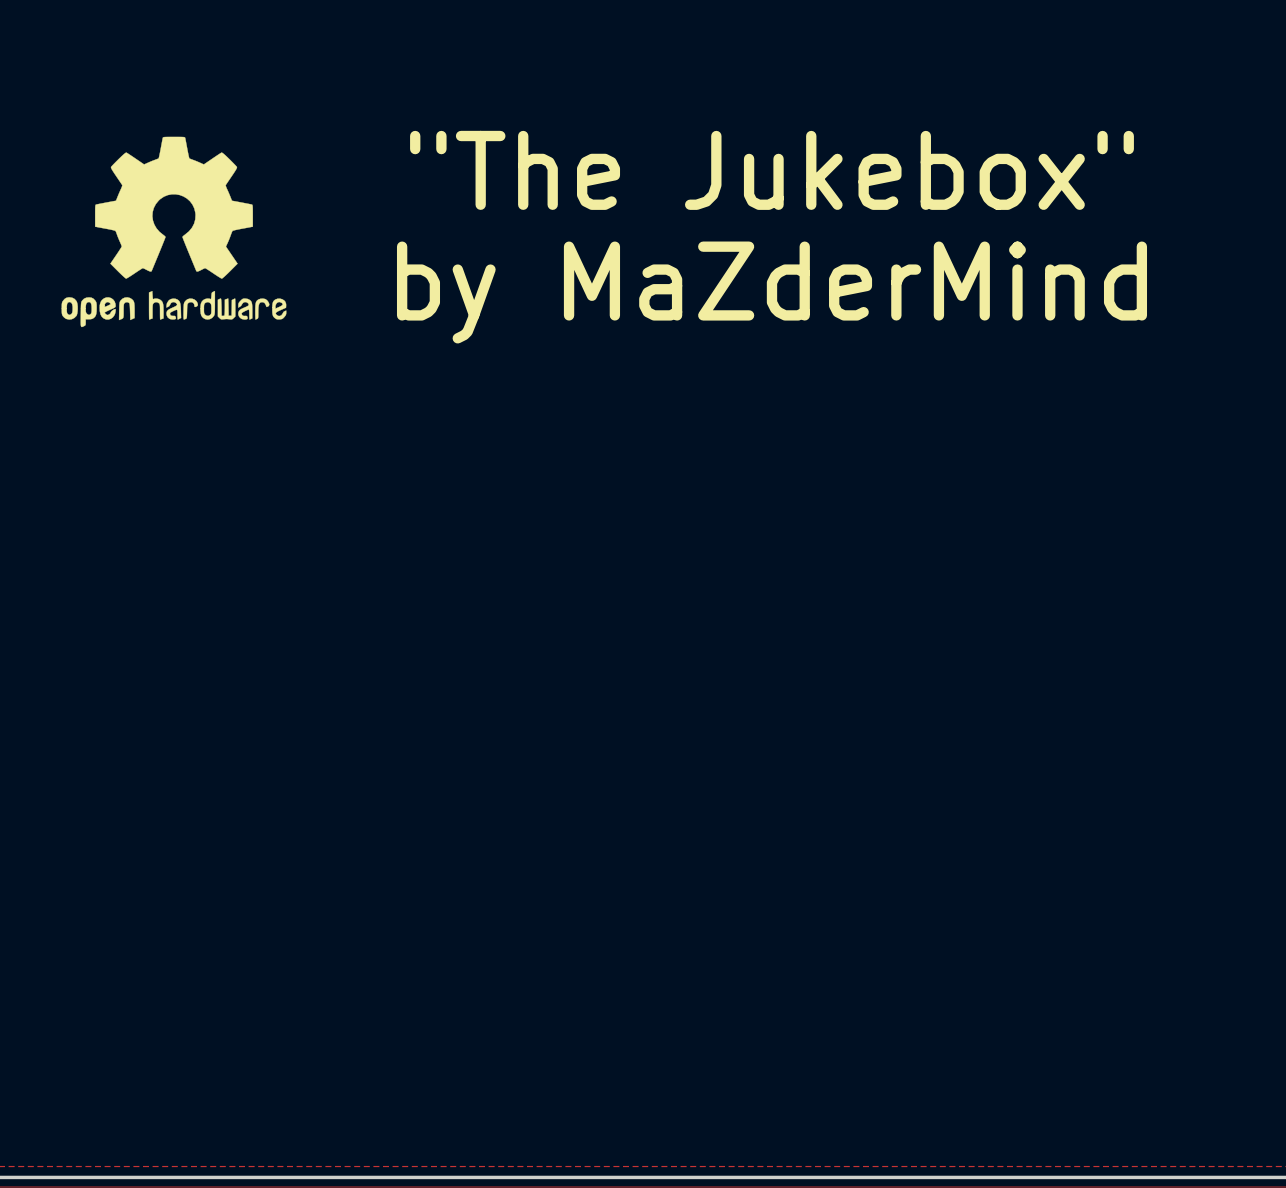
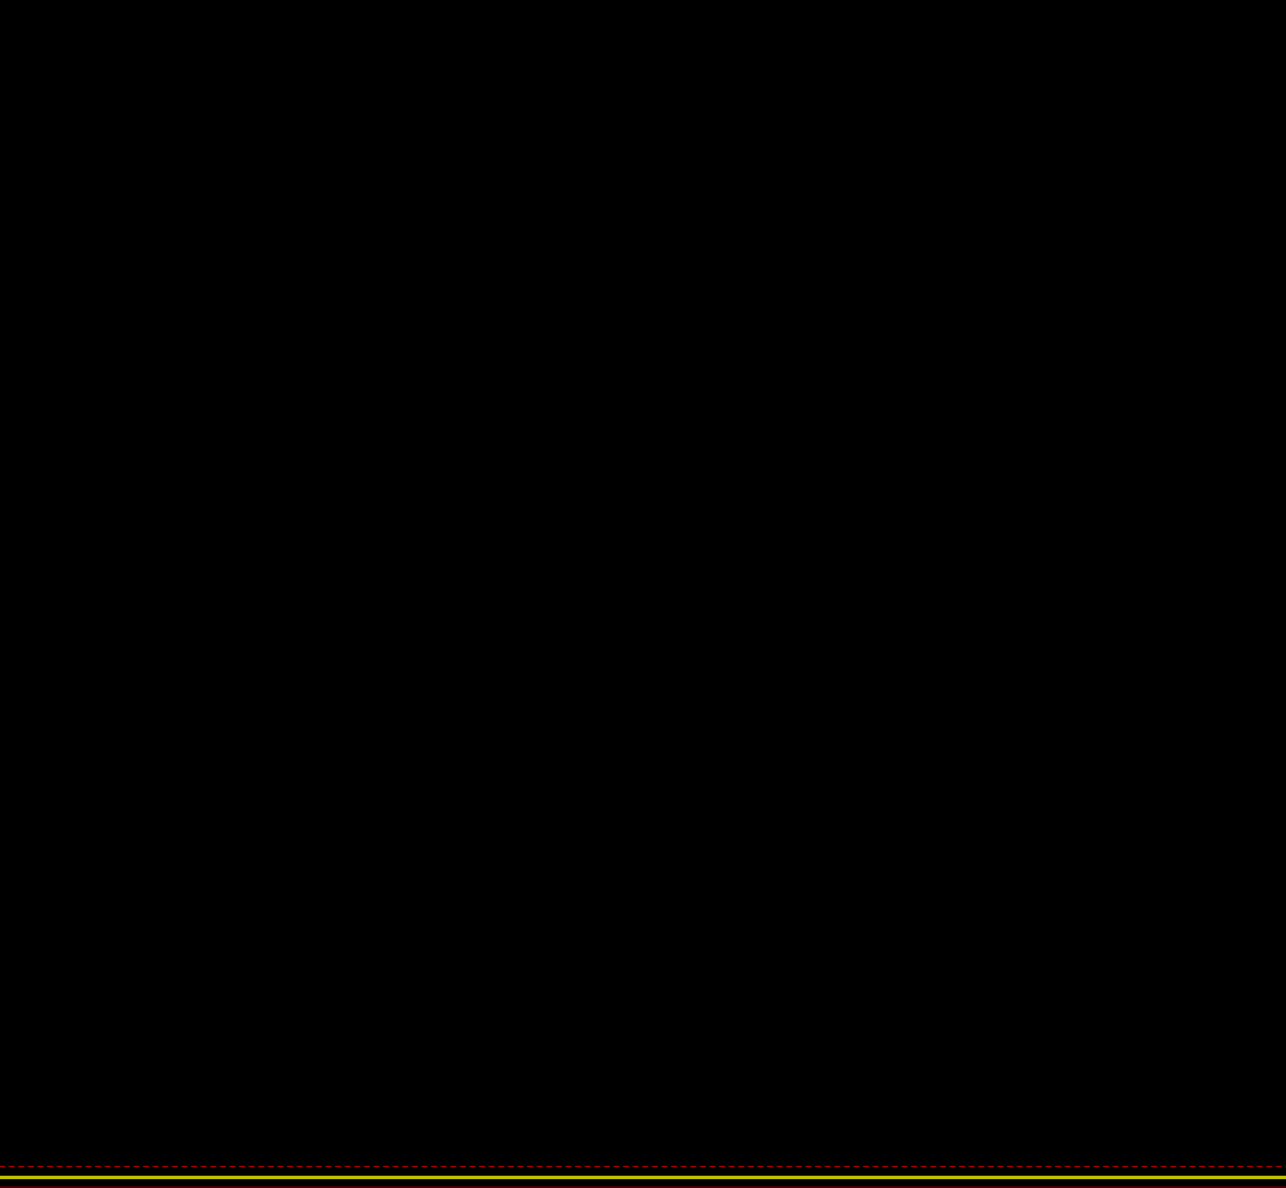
drawing: [61, 136, 287, 328] -> none
text: "The Jukebox" (771, 170) -> none
text: by MaZderMind (771, 292) -> none

